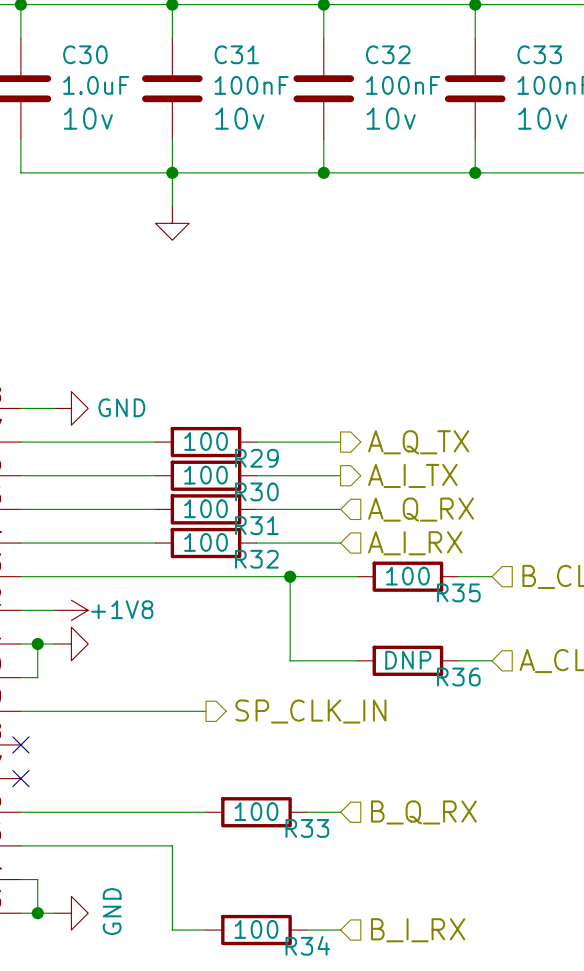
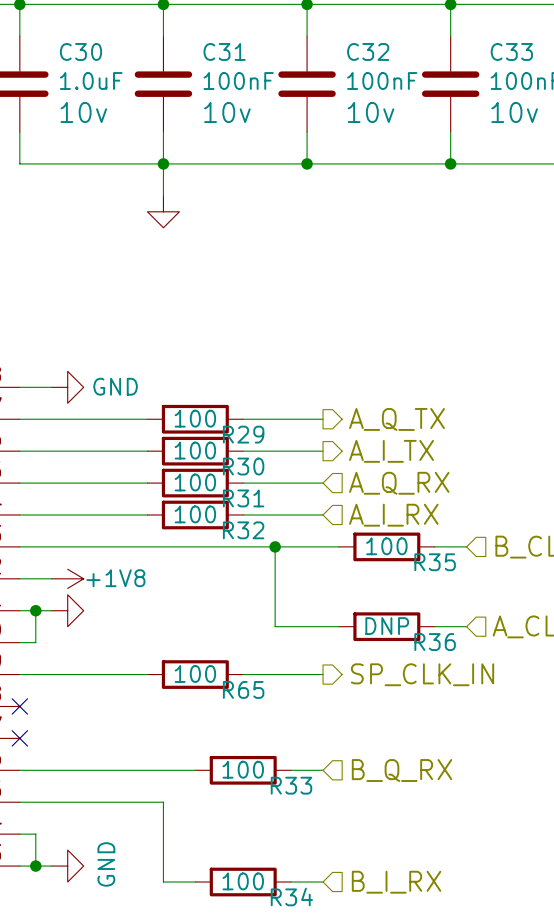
wire: (155, 711) (206, 711) -> none
R65: none -> 100 (195, 674)
wire: none -> (243, 674) (323, 674)
hierarchical label position: SP_CLK_IN (310, 711) -> SP_CLK_IN (422, 674)

